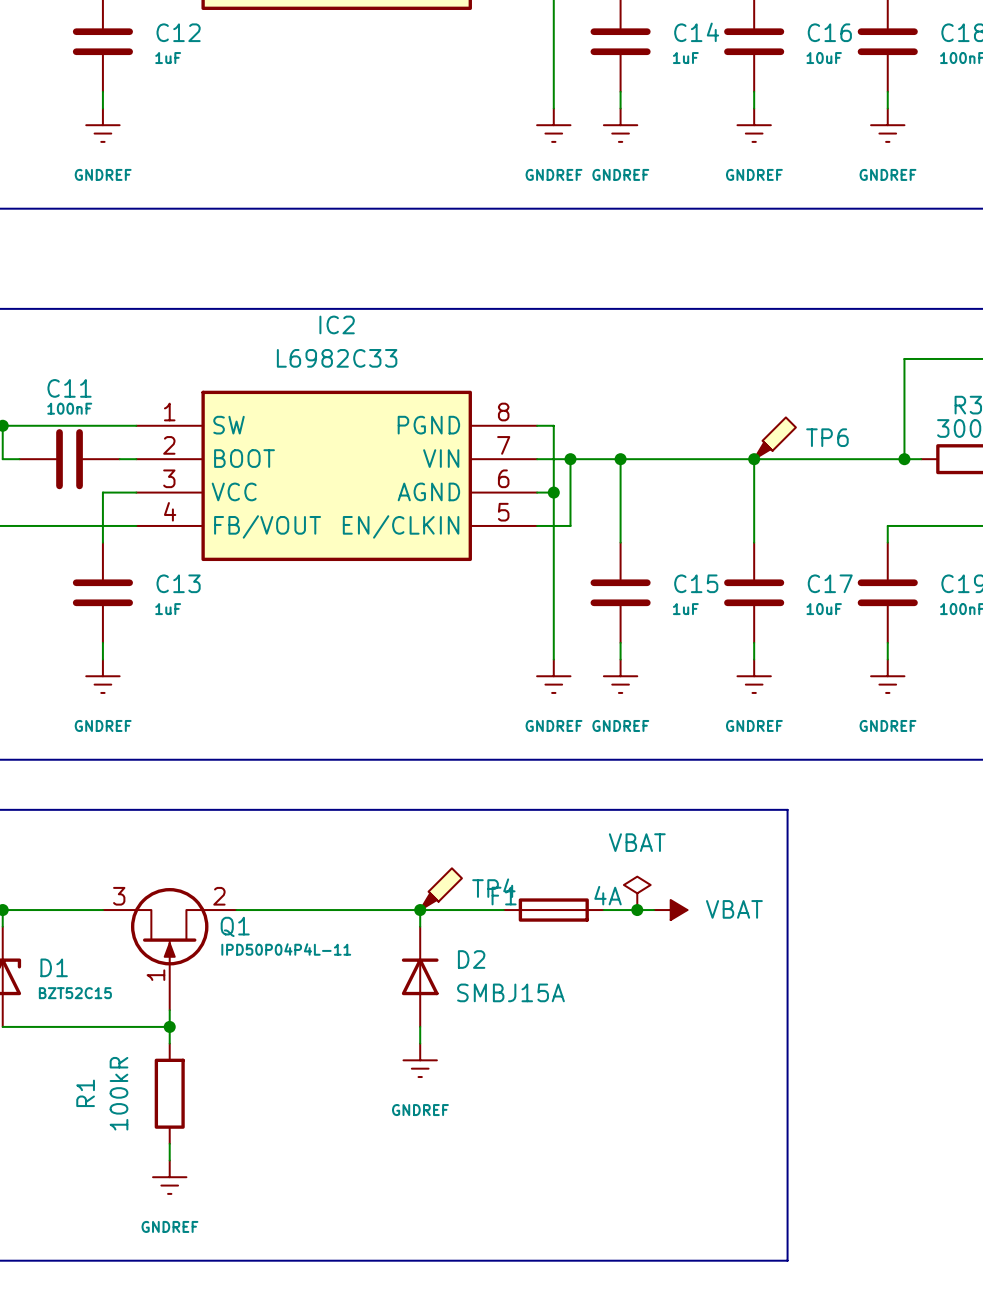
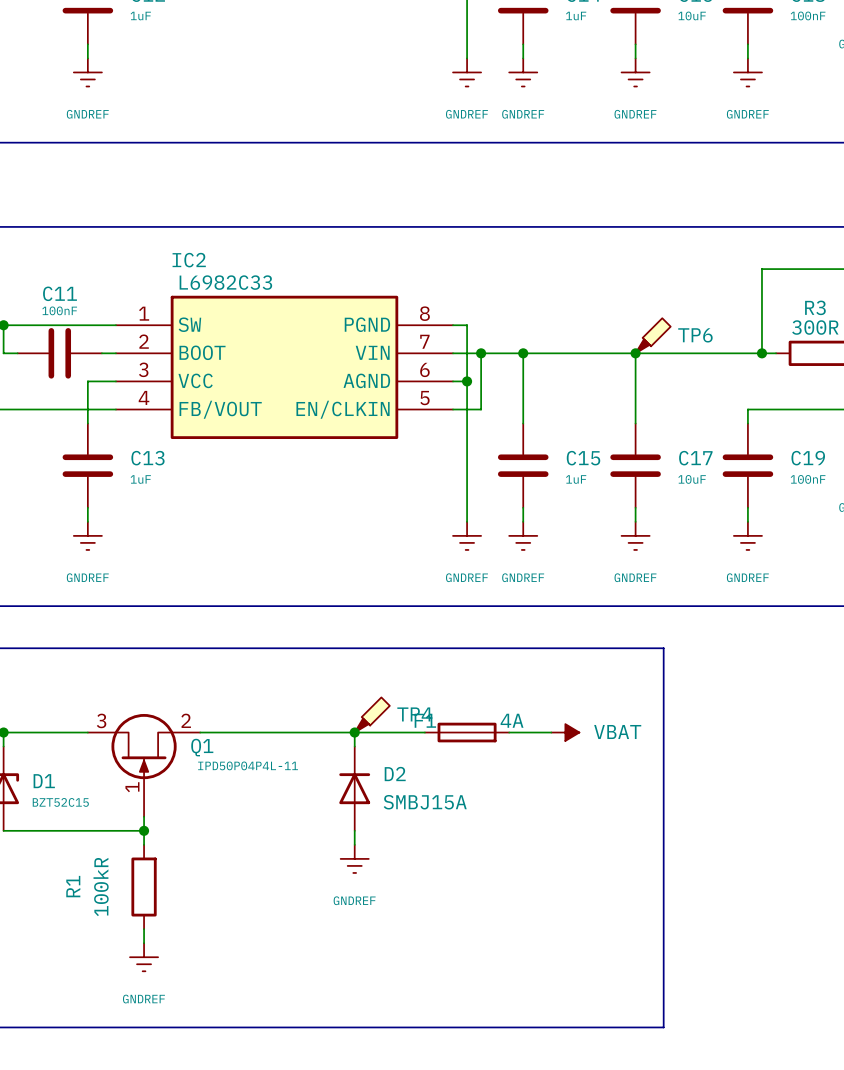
IC2 name position: IC2 (337, 324) -> IC2 (189, 260)
IC2 value position: L6982C33 (337, 358) -> L6982C33 (225, 282)
power symbol: VBAT (637, 893) -> none
junction: (637, 910) -> none

